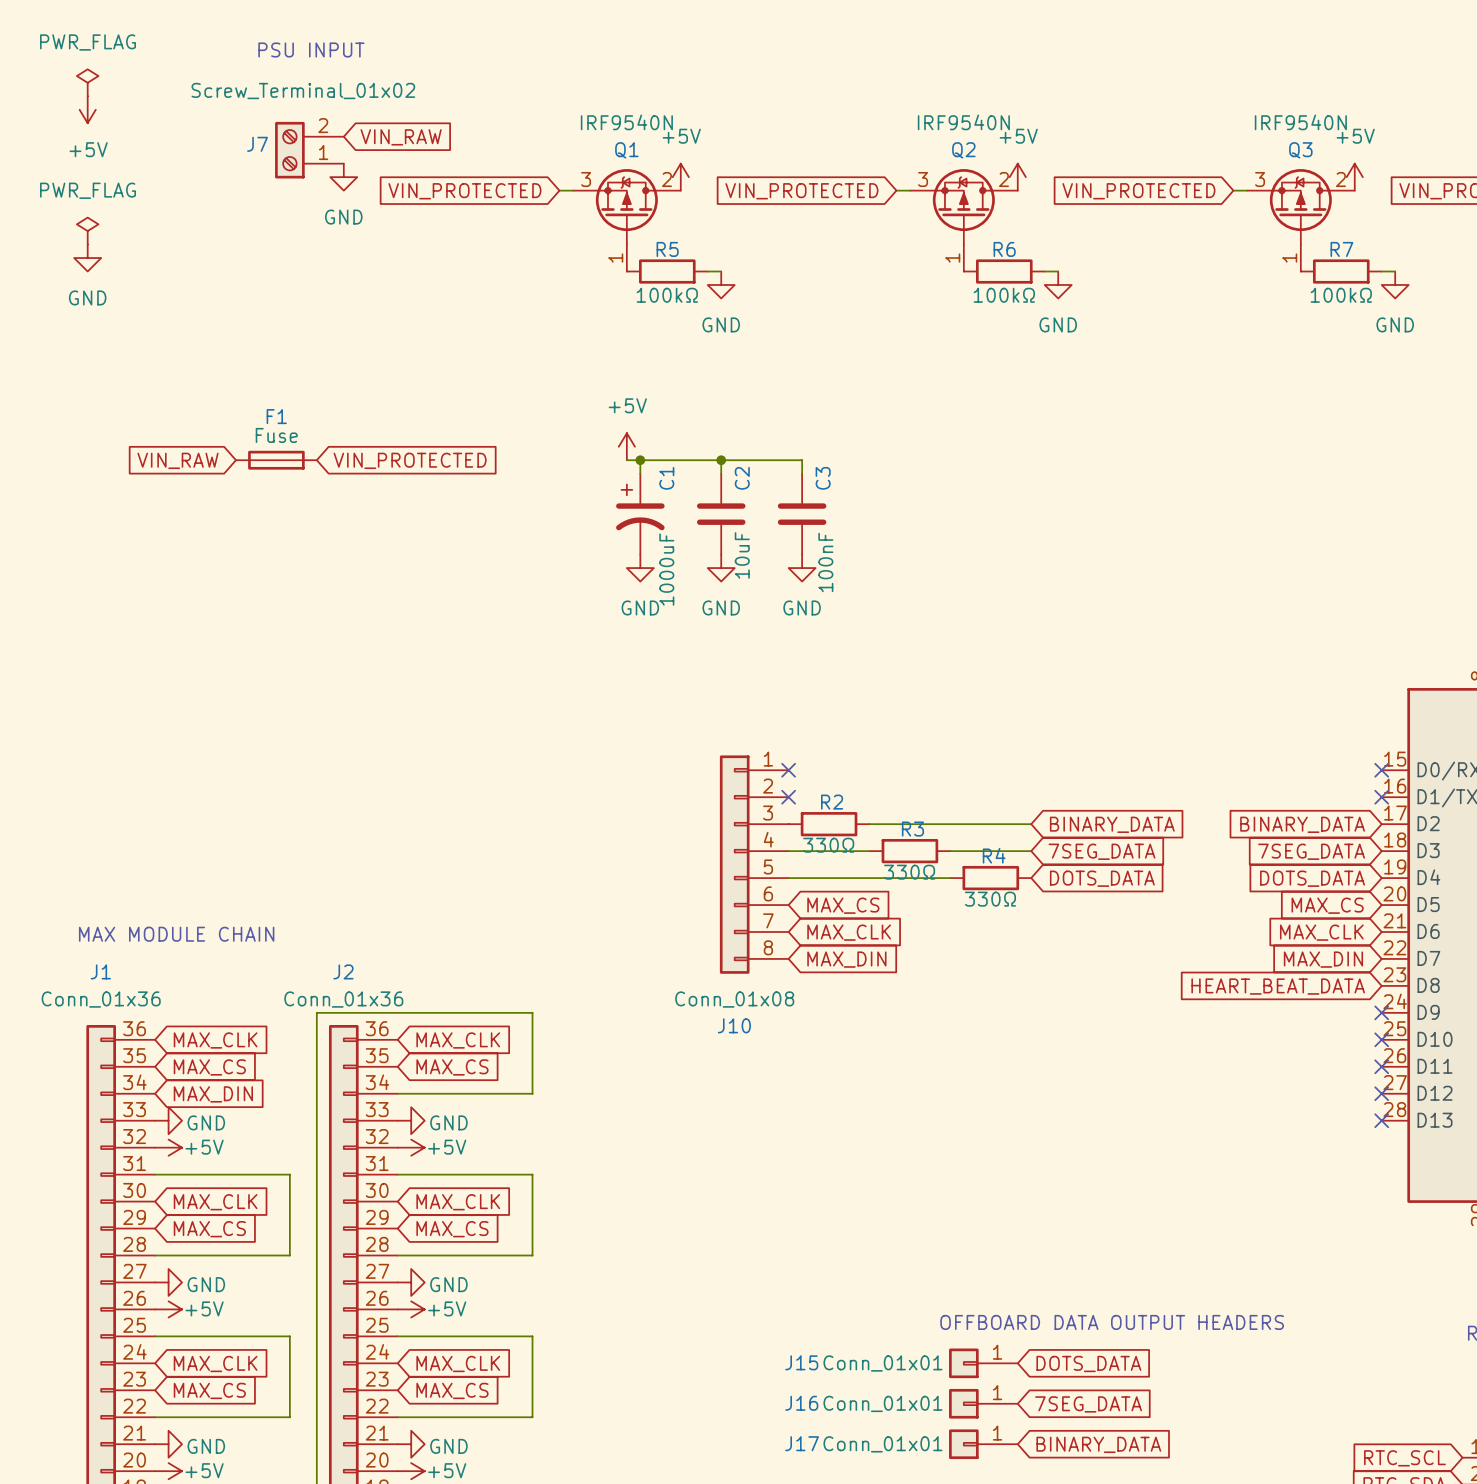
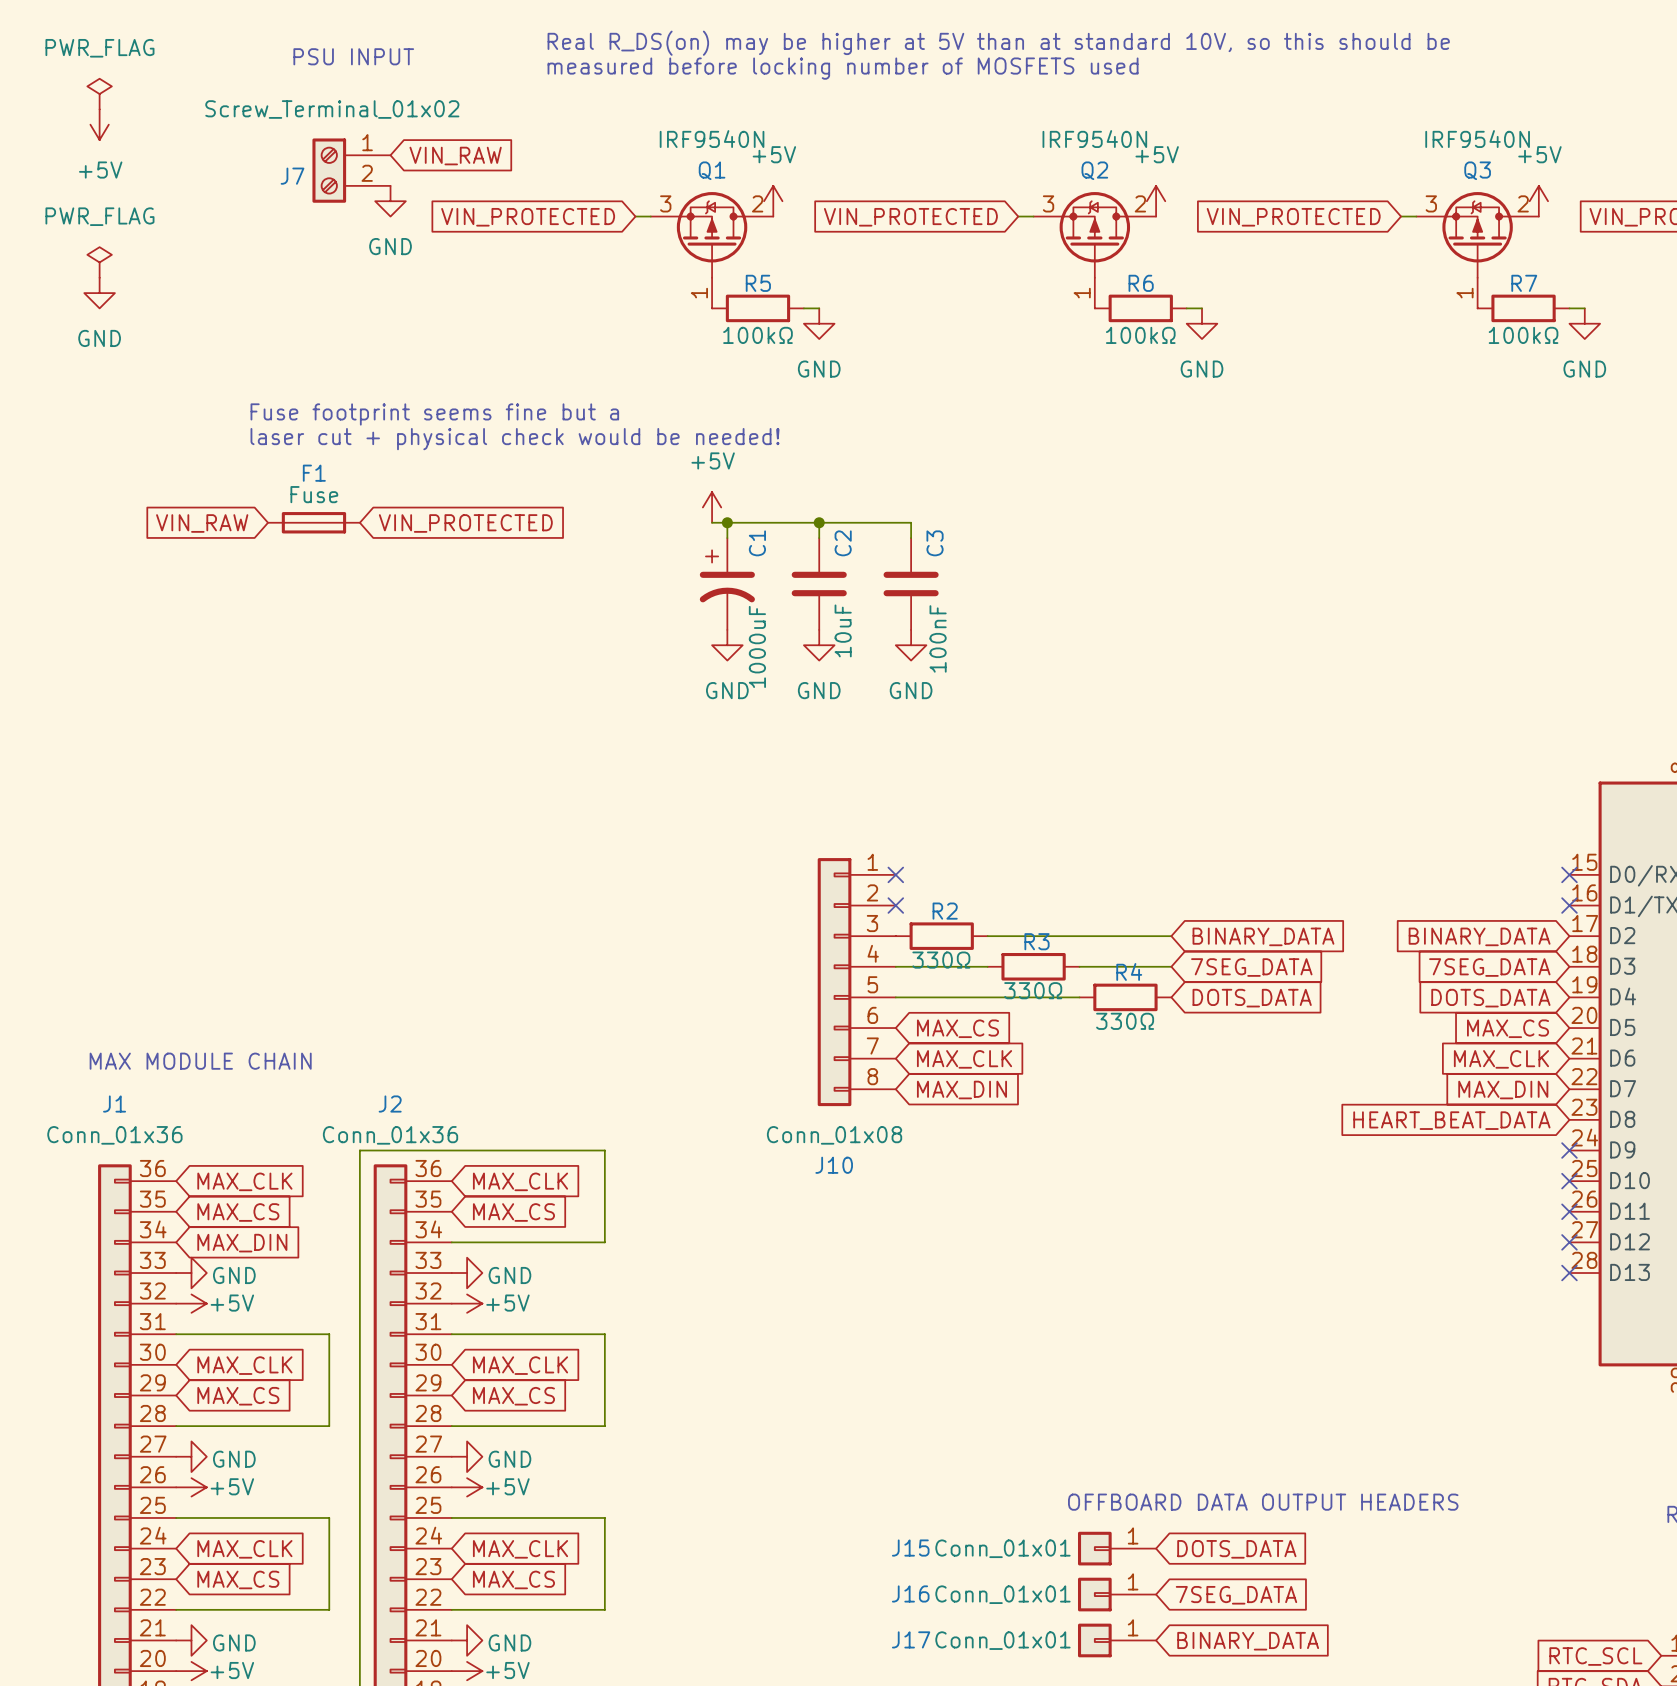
text: none -> Real R_DS(on) may be higher at 5V than at standard 10V, so this should be (998, 43)
text: none -> measured before locking number of MOSFETS used (843, 68)
J7 flip: as is (289, 150) -> up-down (329, 170)
text: none -> Fuse footprint seems fine but a (434, 414)
text: none -> laser cut + physical check would be needed! (515, 439)

